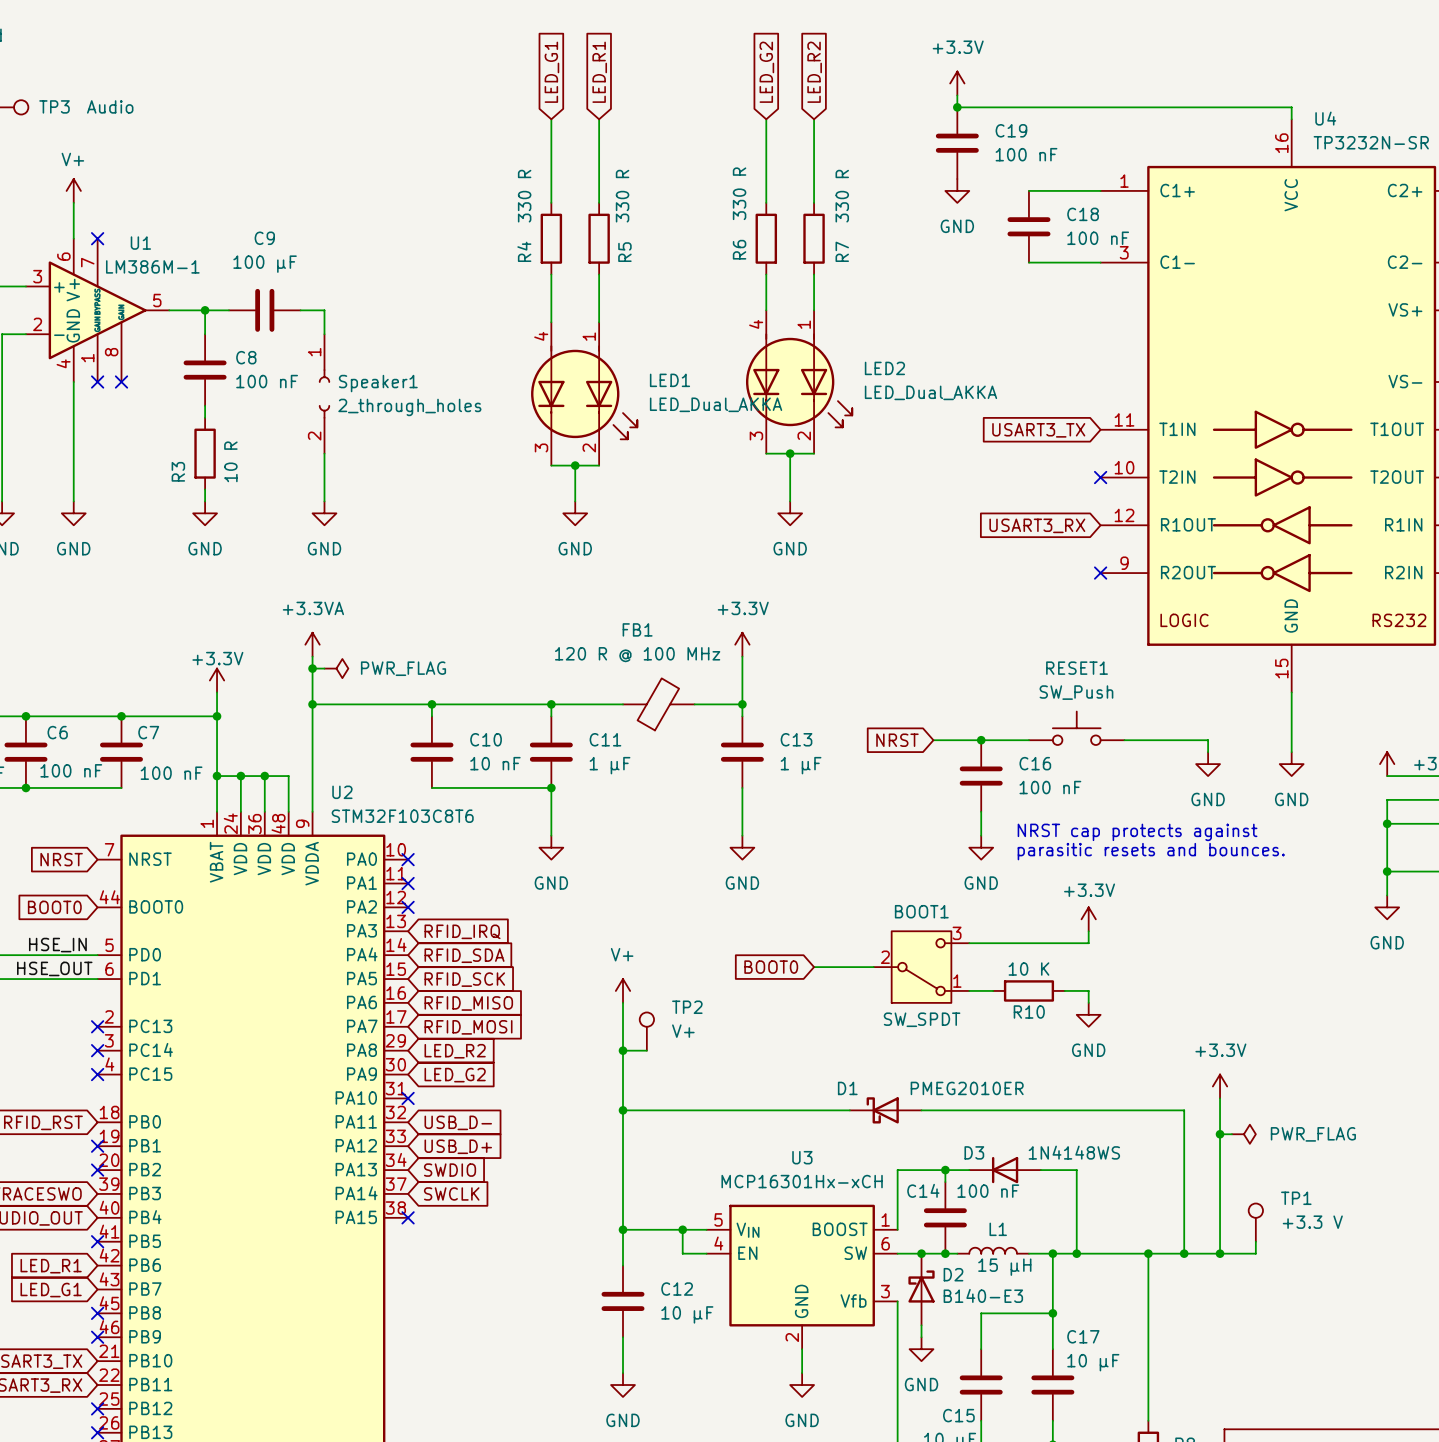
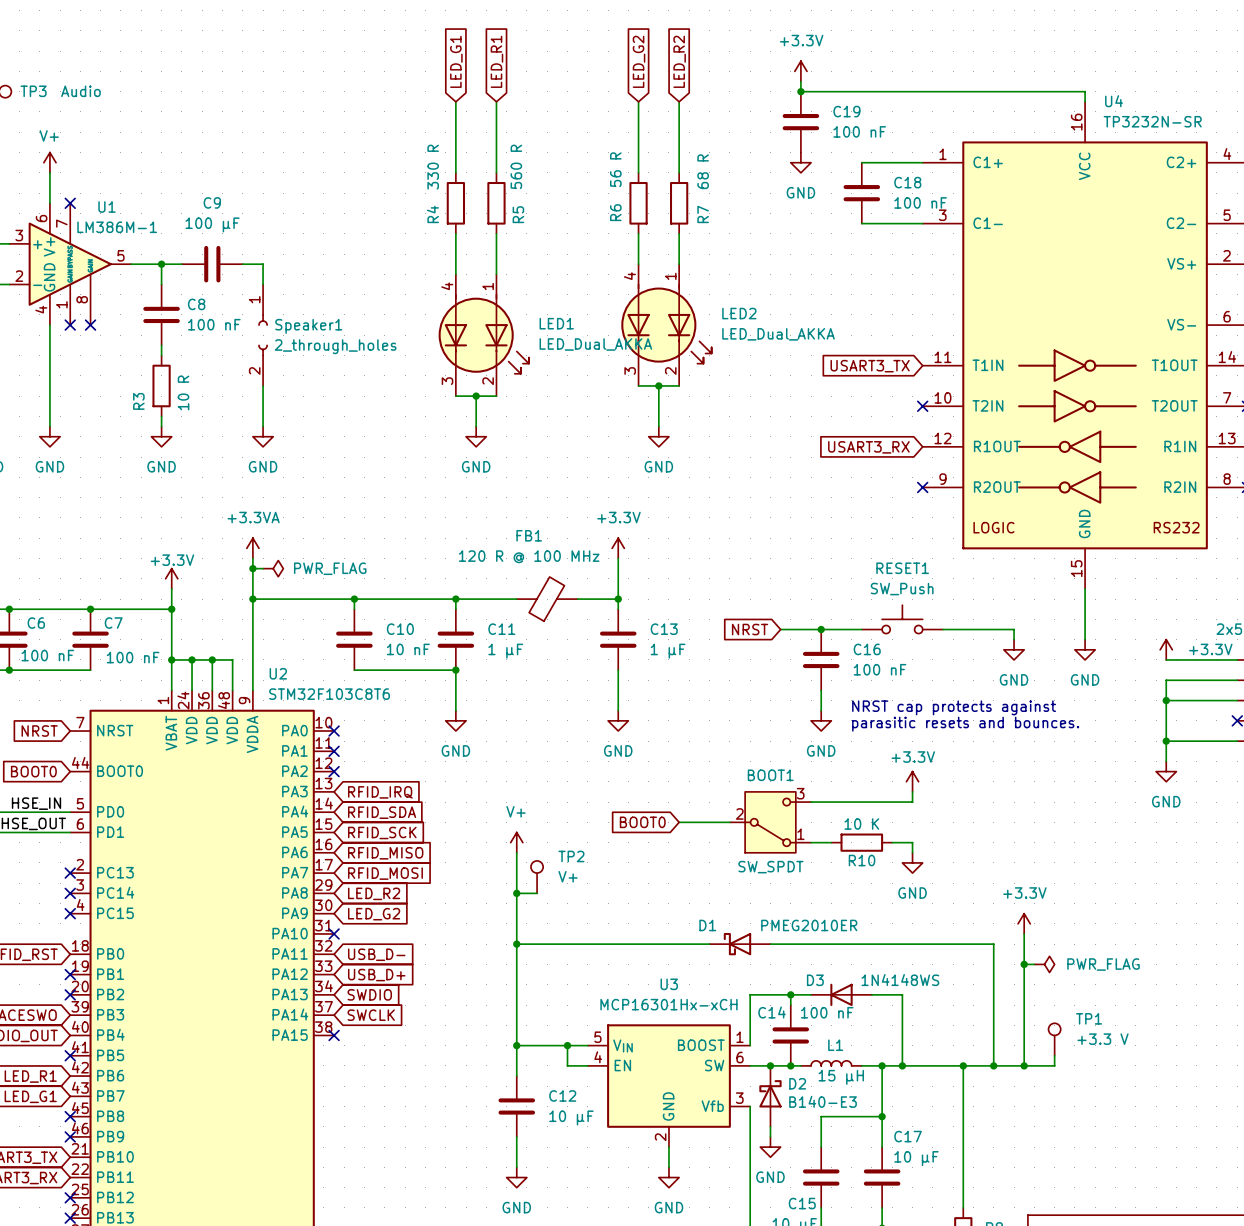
R6 value: 330 R (739, 193) -> 56 R (615, 169)
R5 value: 330 R (622, 196) -> 560 R (516, 166)
R7 value: 330 R (842, 196) -> 68 R (703, 171)

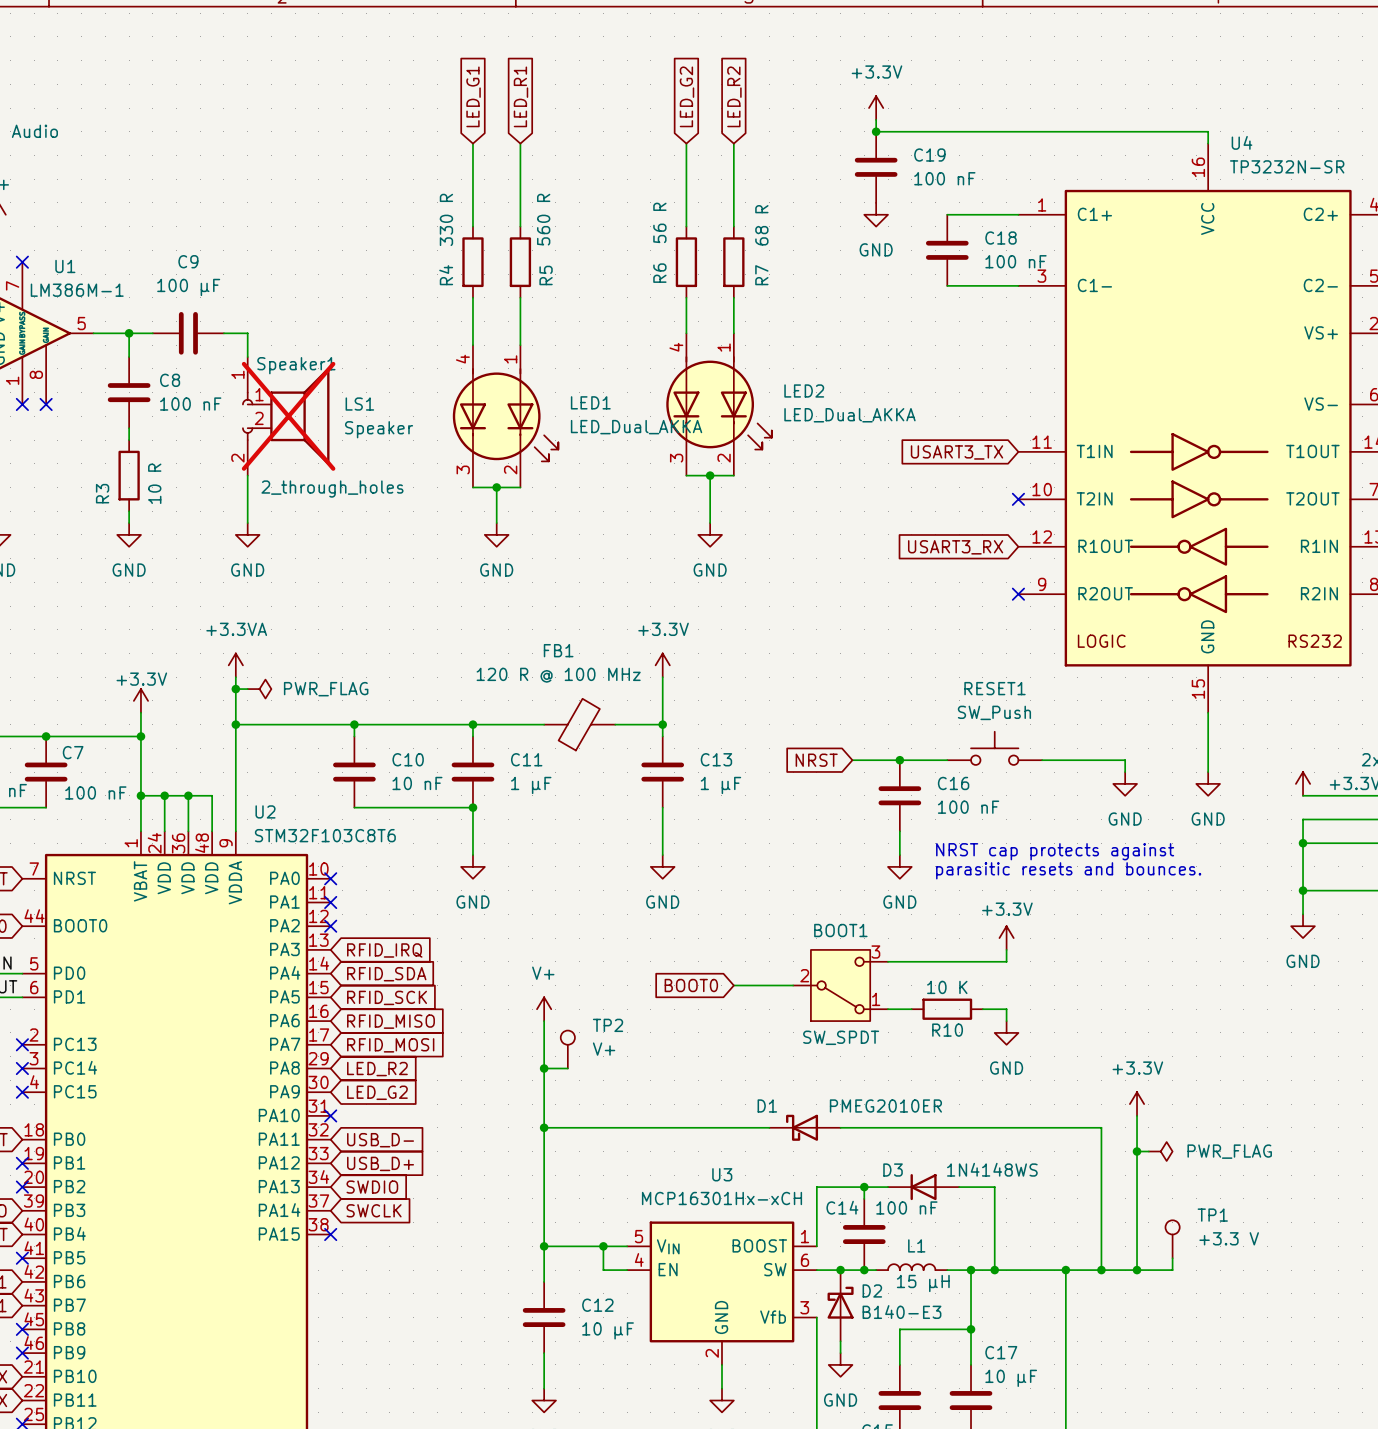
Speaker1 name position: Speaker1 (308, 326) -> Speaker1 (296, 365)
LS1: none -> Speaker (288, 416)
Speaker1 value position: 2_through_holes (335, 346) -> 2_through_holes (332, 489)

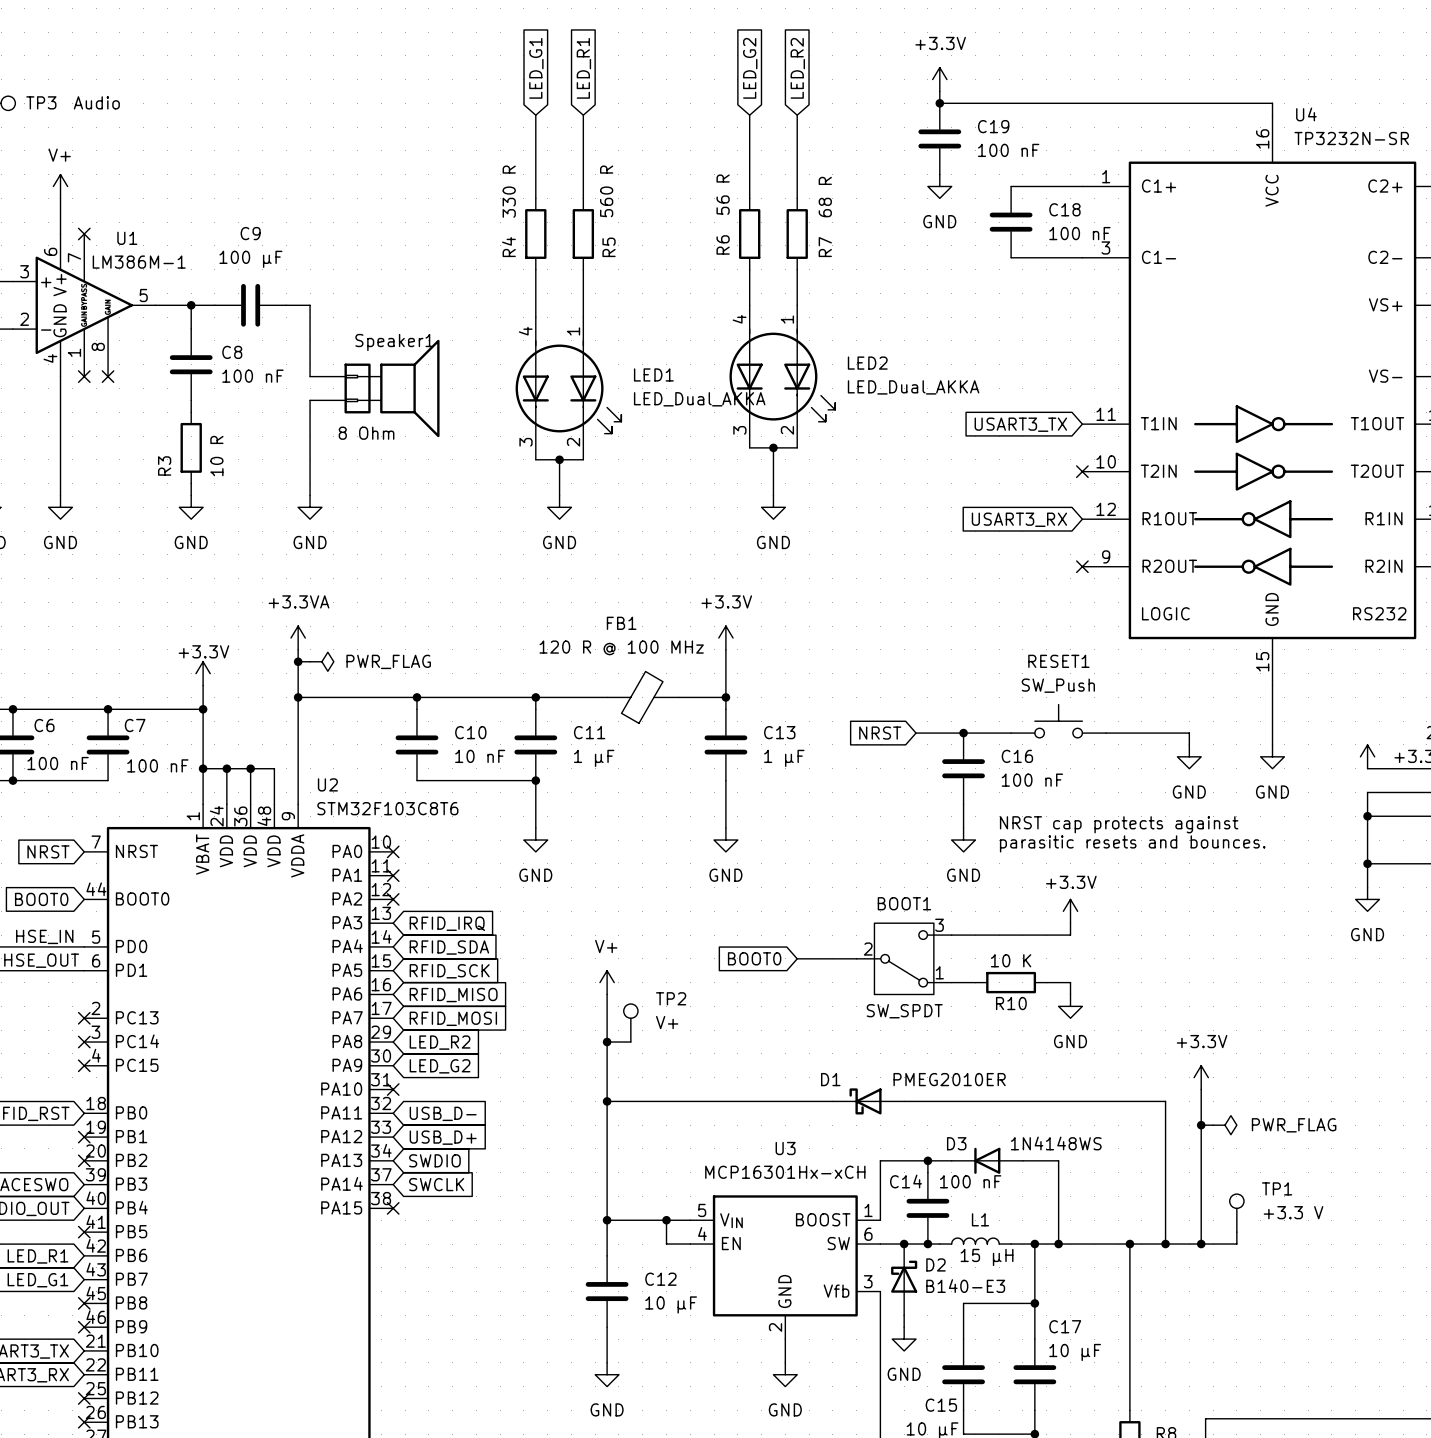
Speaker1 symbol: [242, 357, 254, 476] -> [310, 339, 440, 438]
Speaker1 name position: Speaker1 (296, 365) -> Speaker1 (394, 342)
LS1: Speaker (288, 416) -> none
Speaker1 value: 2_through_holes (332, 489) -> 8 Ohm (366, 433)

